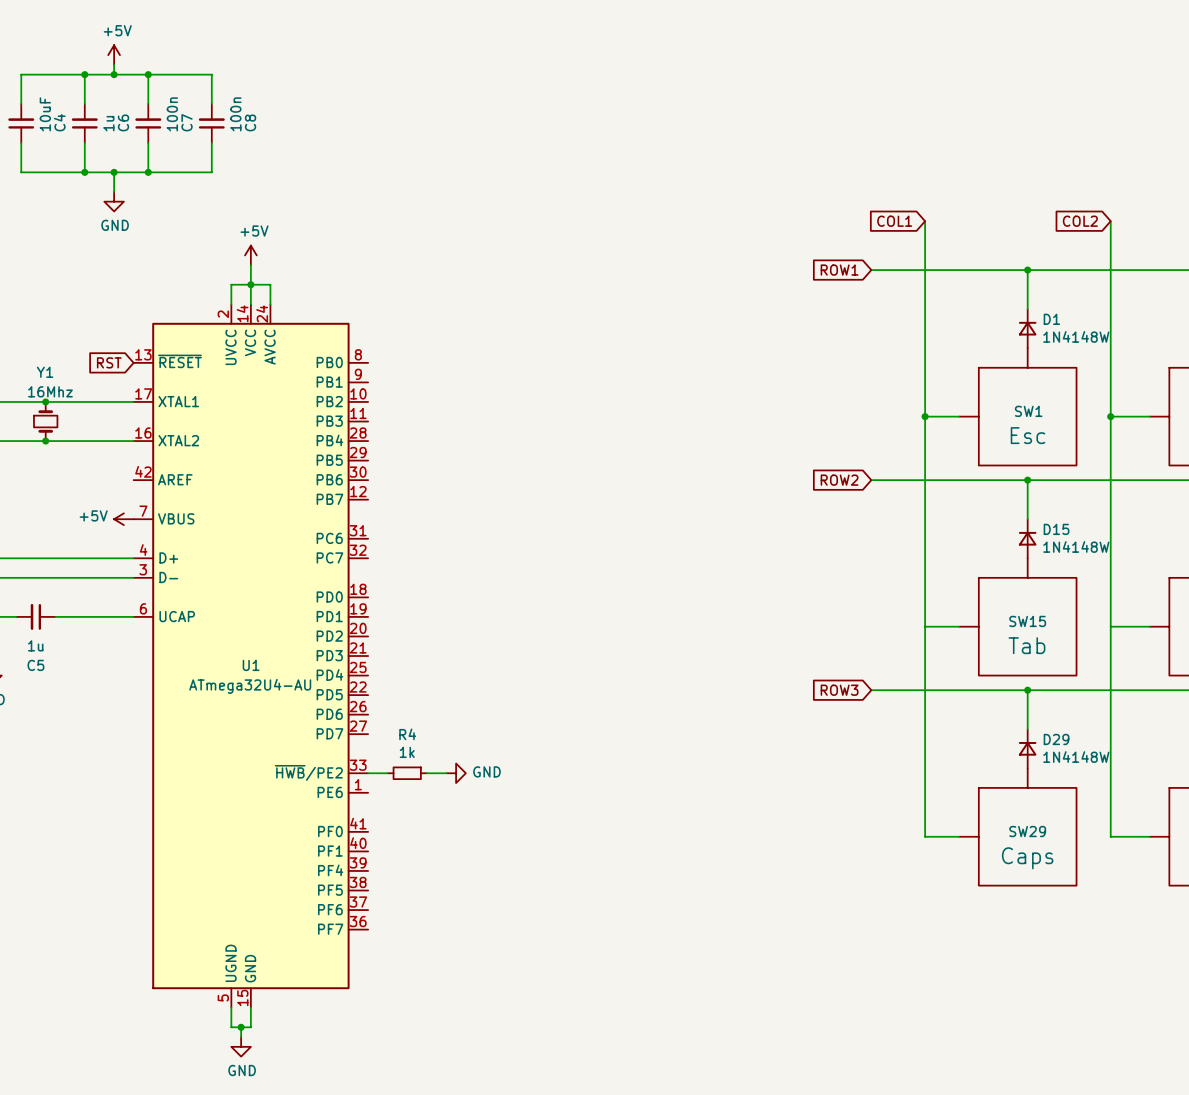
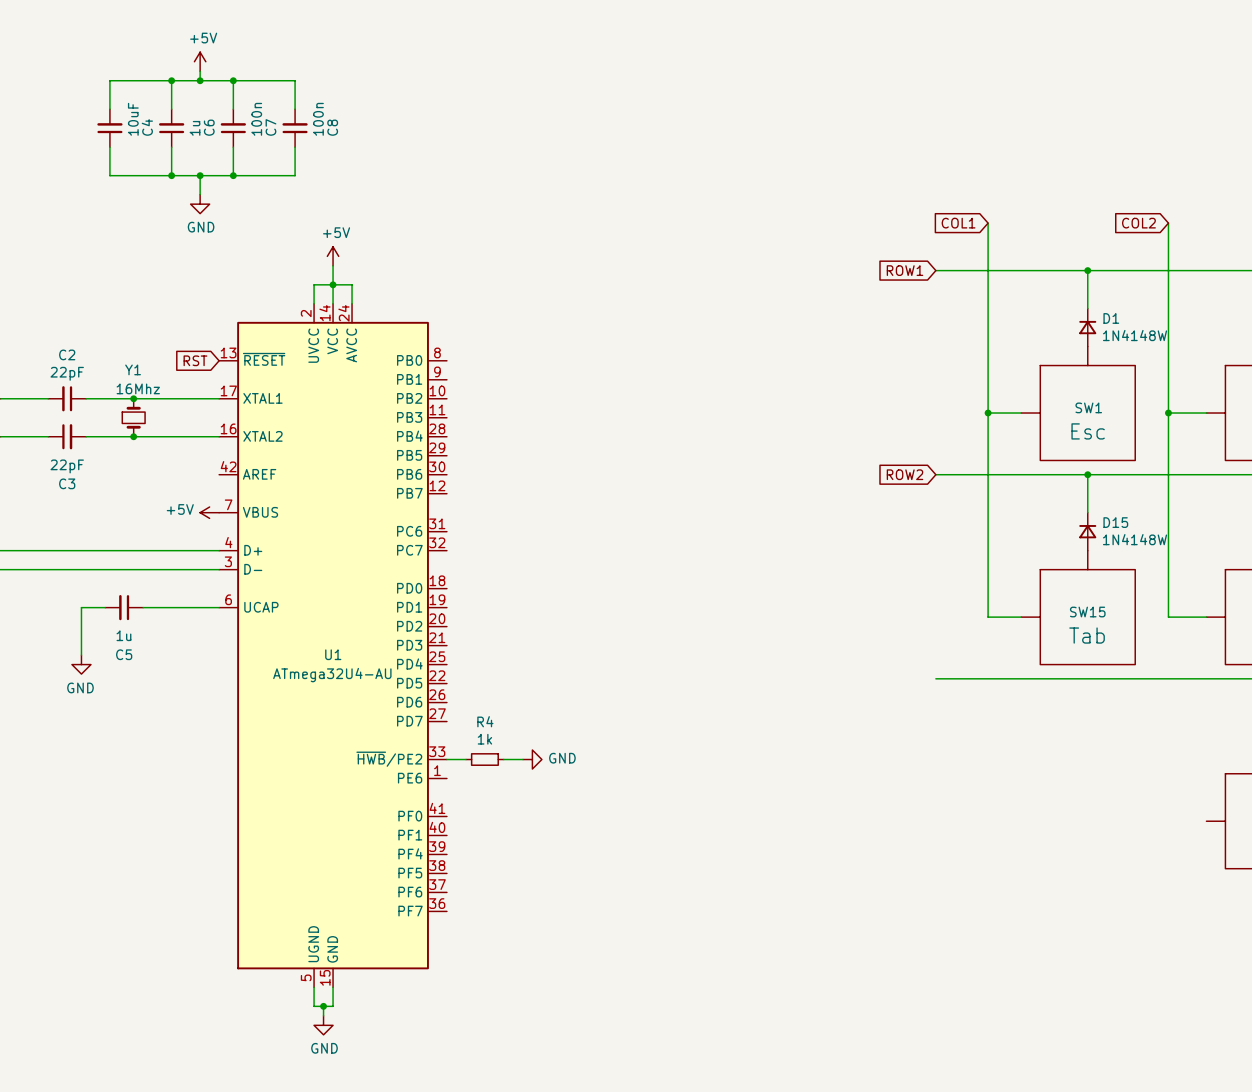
wire: (925, 626) (925, 836) (959, 836) -> none
wire: (1110, 626) (1110, 836) (1149, 836) -> none
global label: ROW3 (839, 690) -> none
wire: (1027, 690) (1027, 729) -> none
junction: (1027, 690) -> none
D29: 1N4148W (1027, 748) -> none
SW29: Caps (1017, 827) -> none

